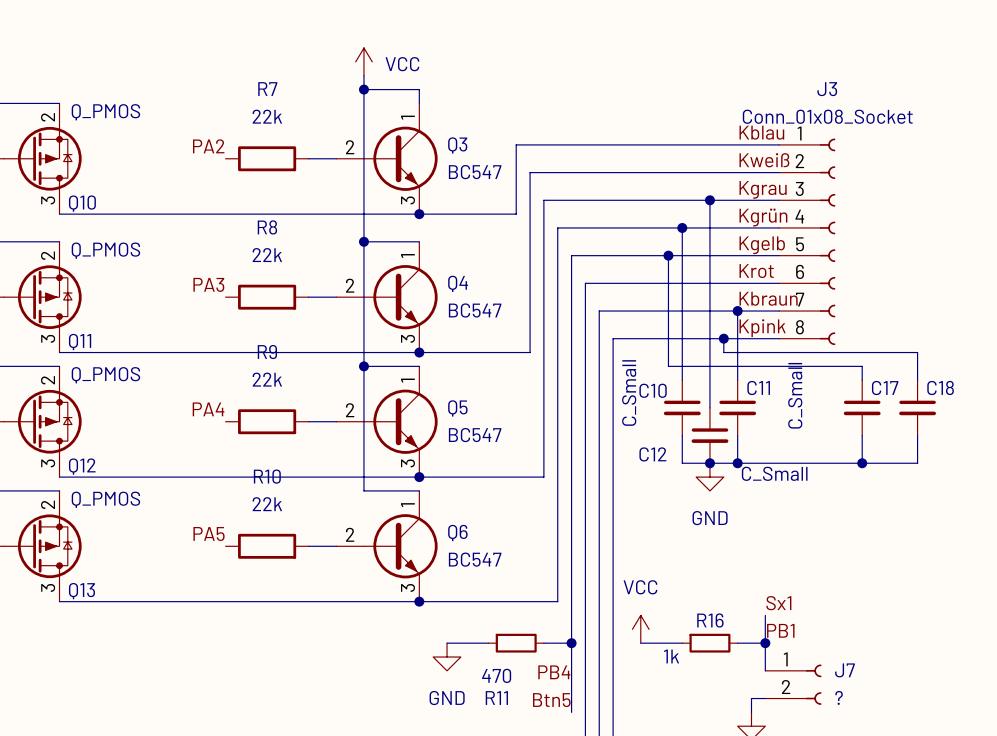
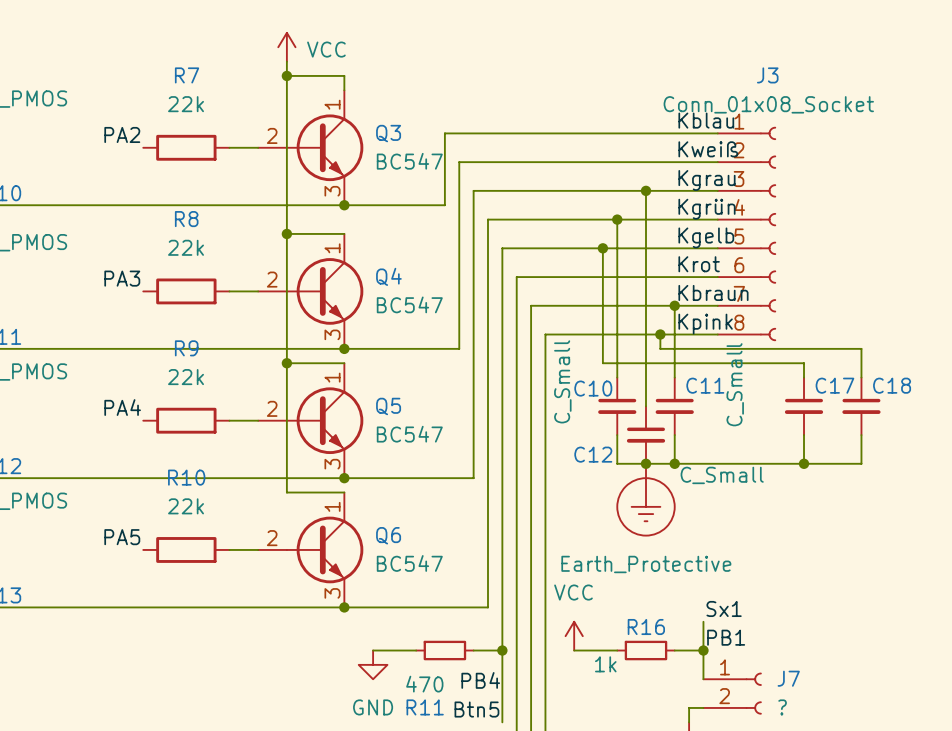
power symbol: GND (709, 477) -> none
power symbol: none -> Earth_Protective (646, 499)

